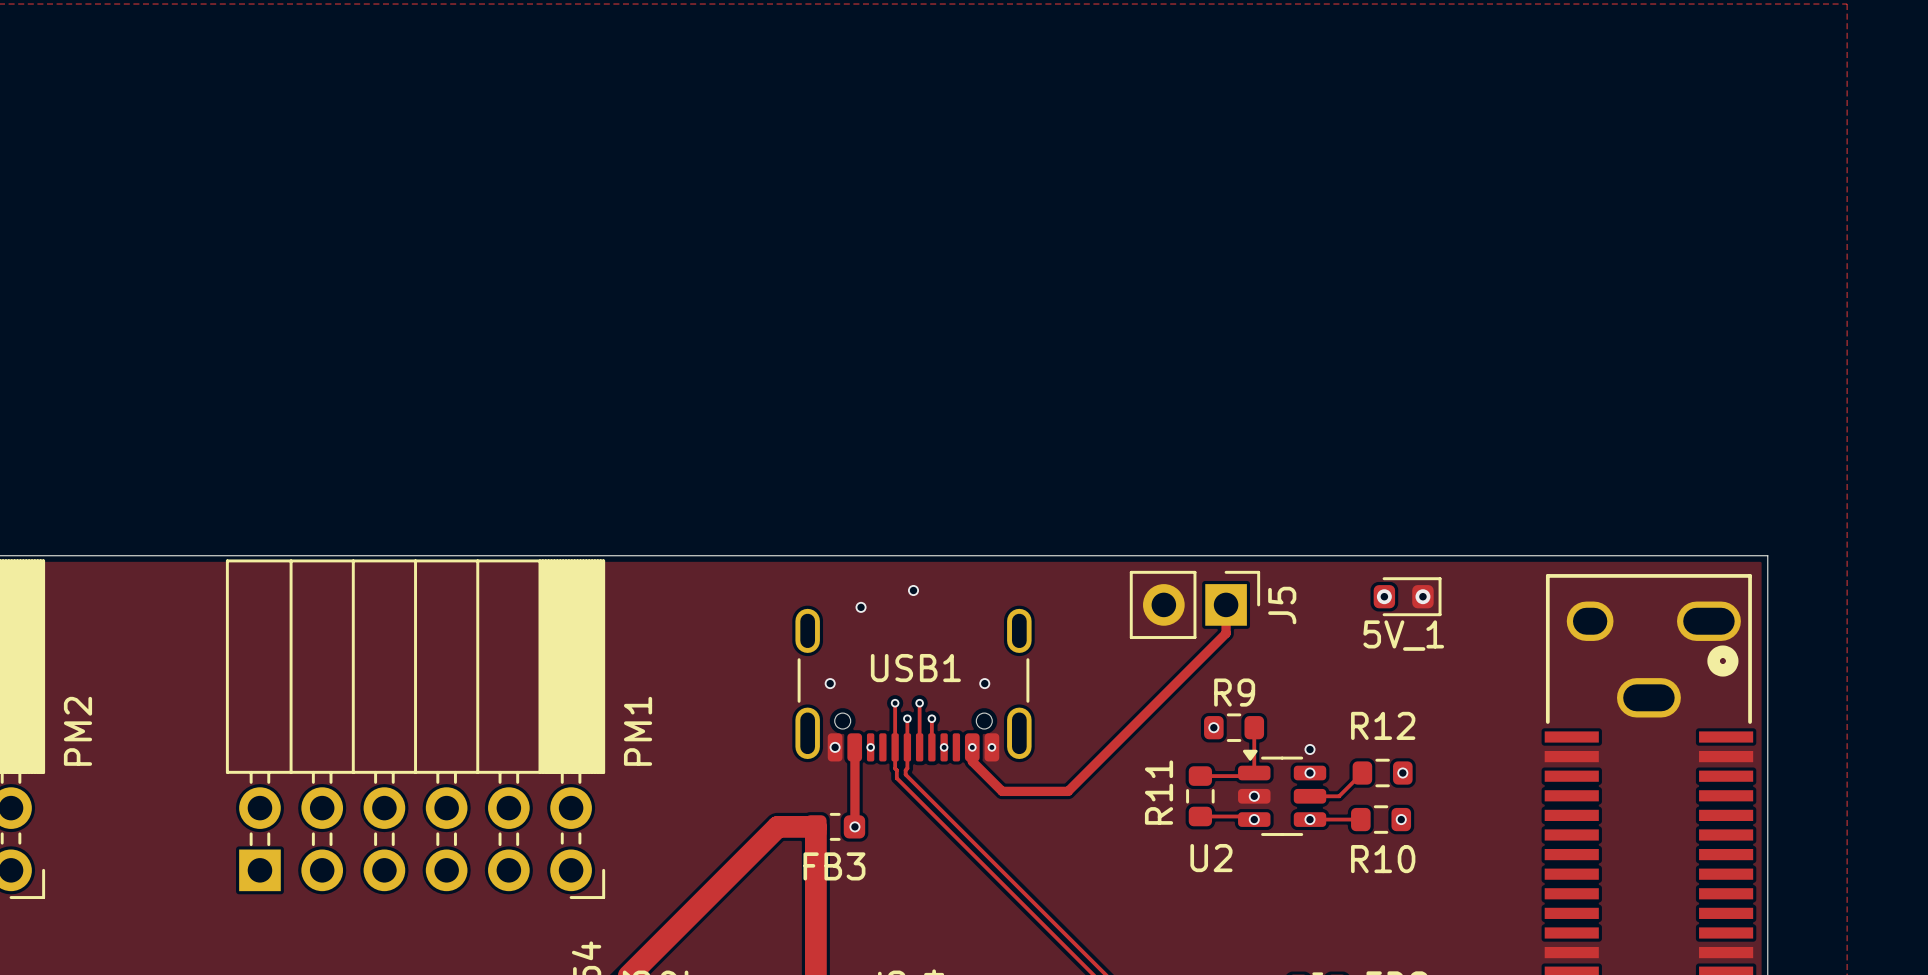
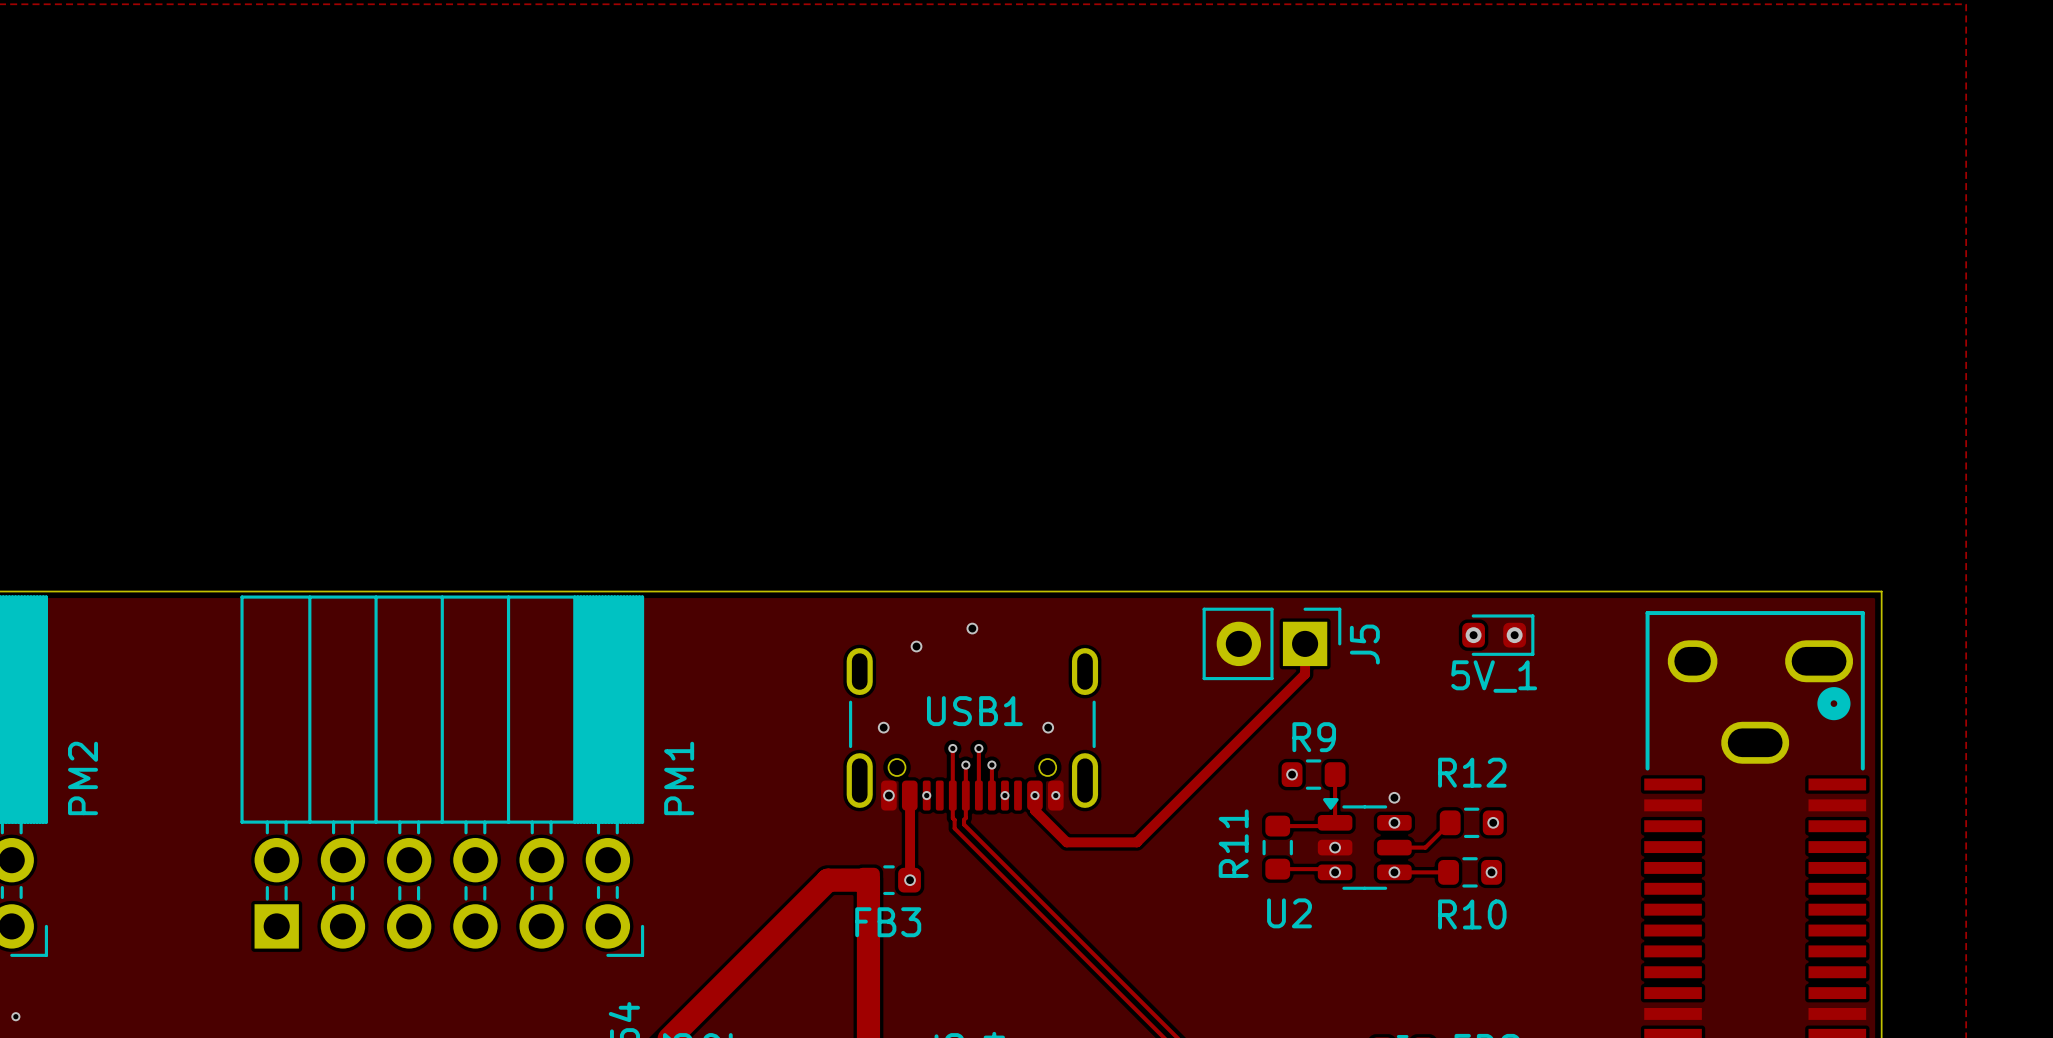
via: none -> (15, 1016)

